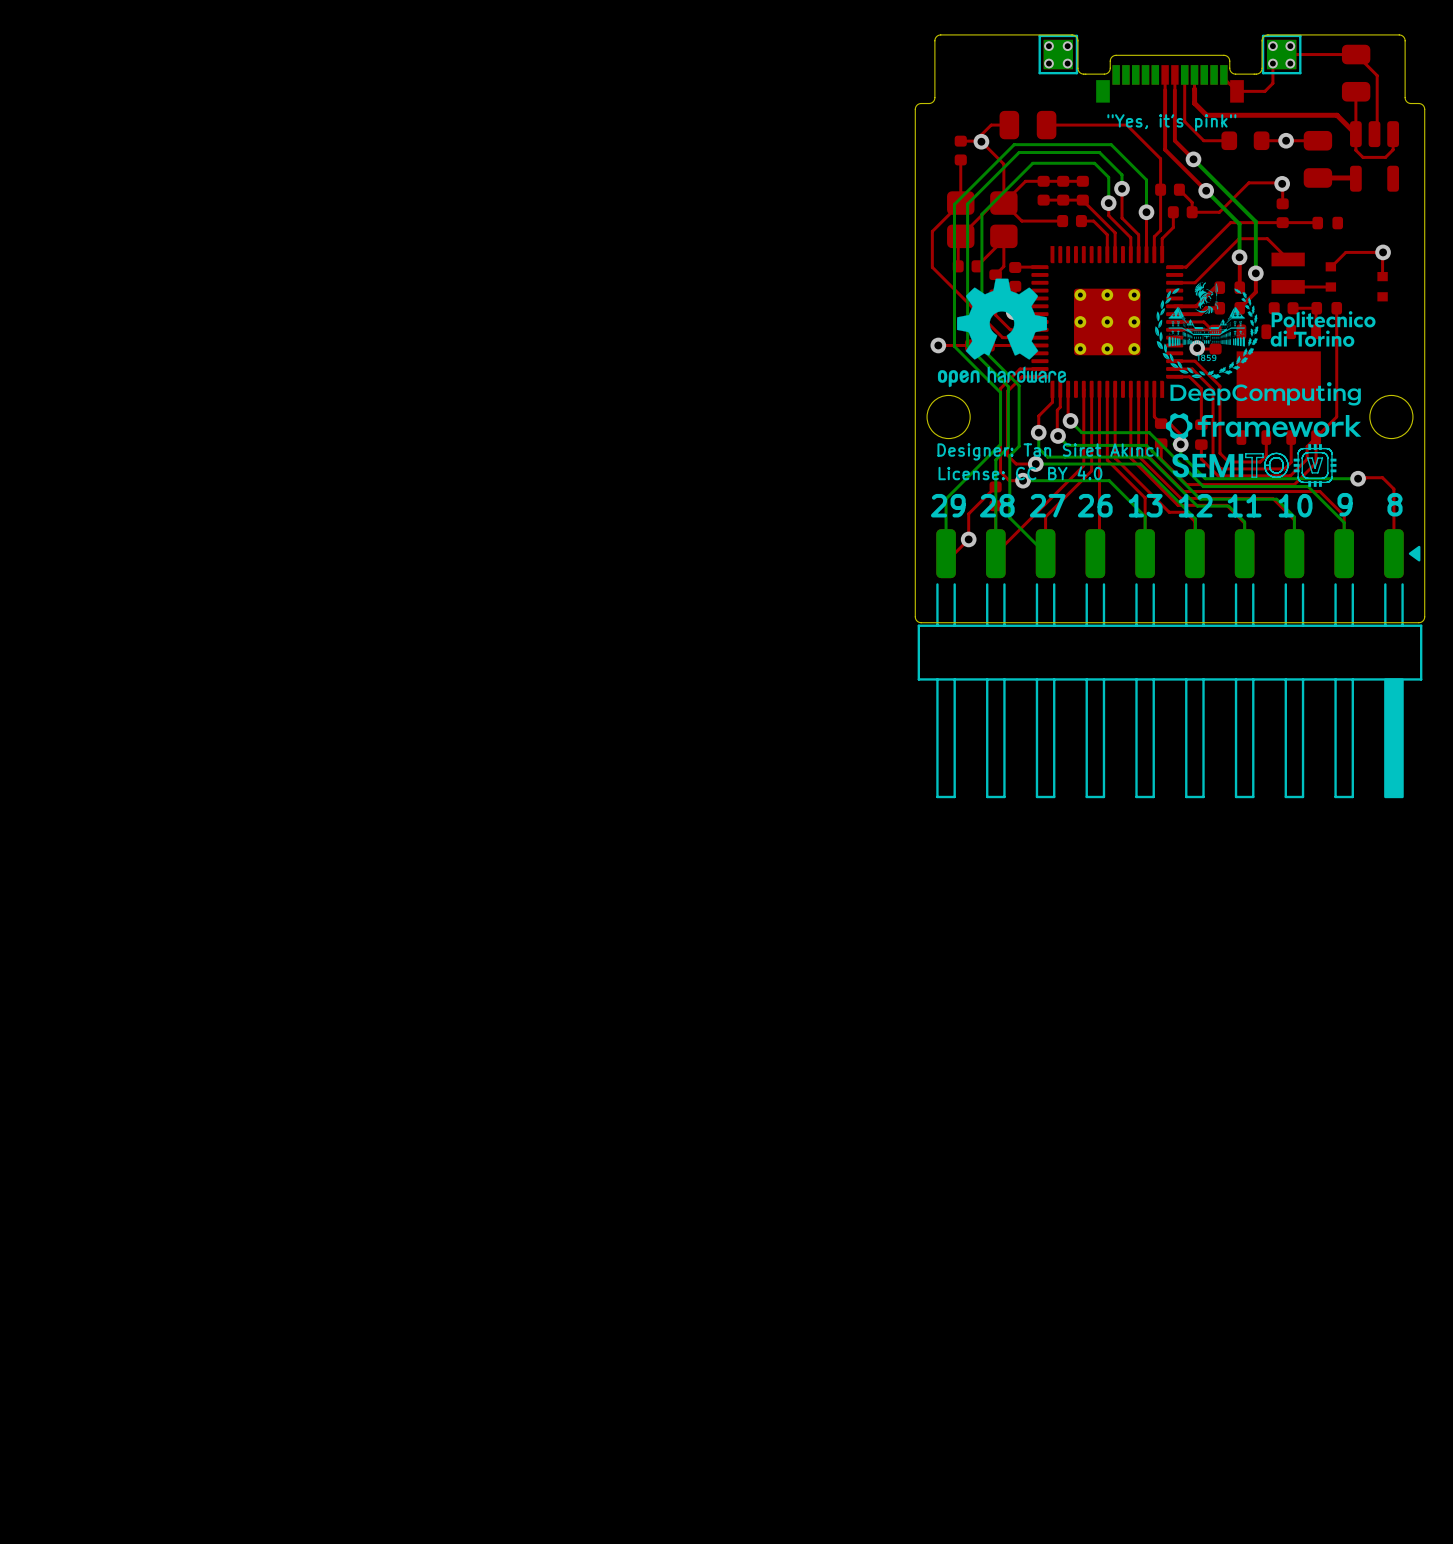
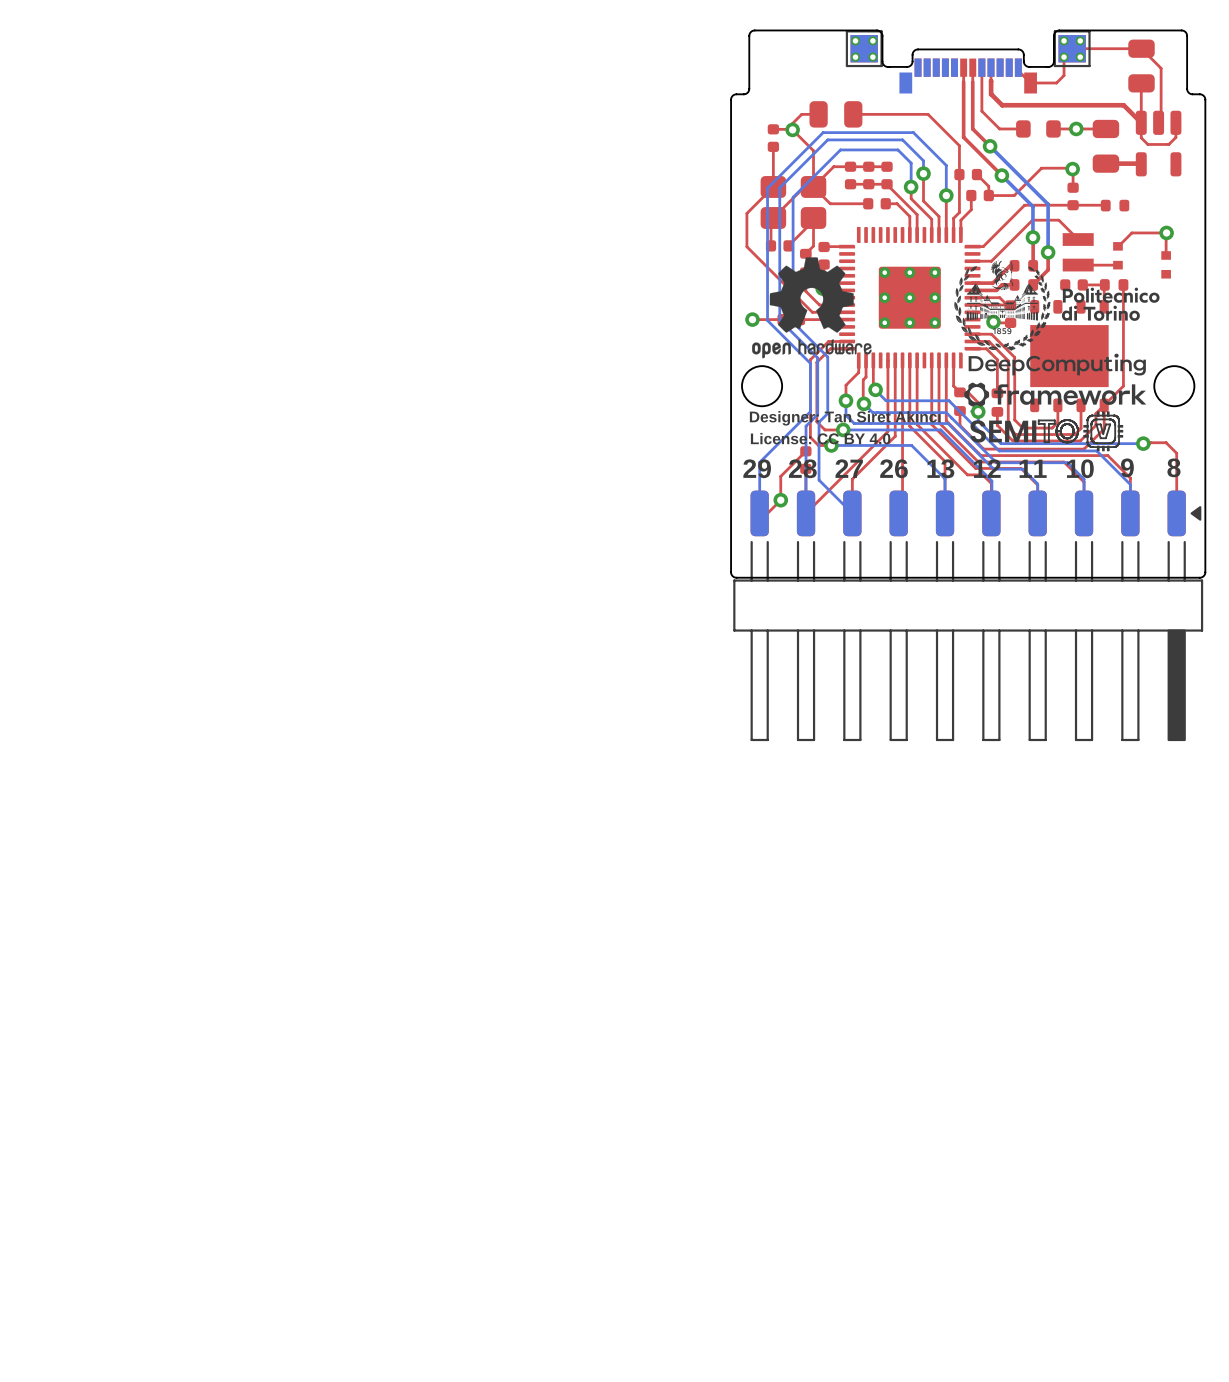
text: "Yes, it's pink" (1171, 122) -> none

